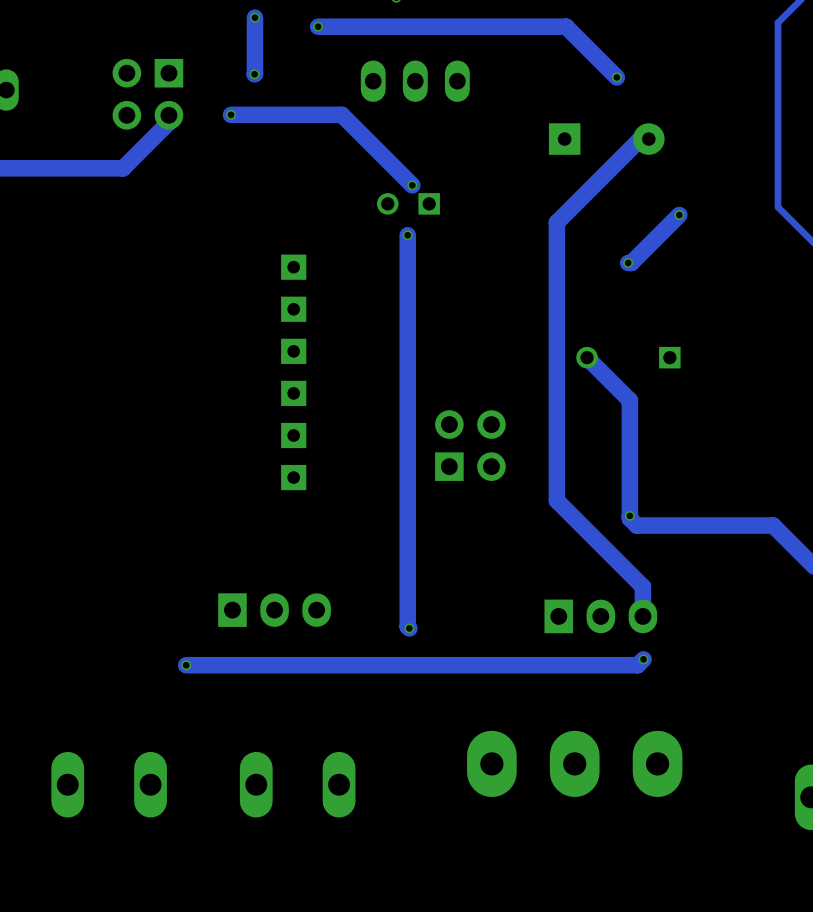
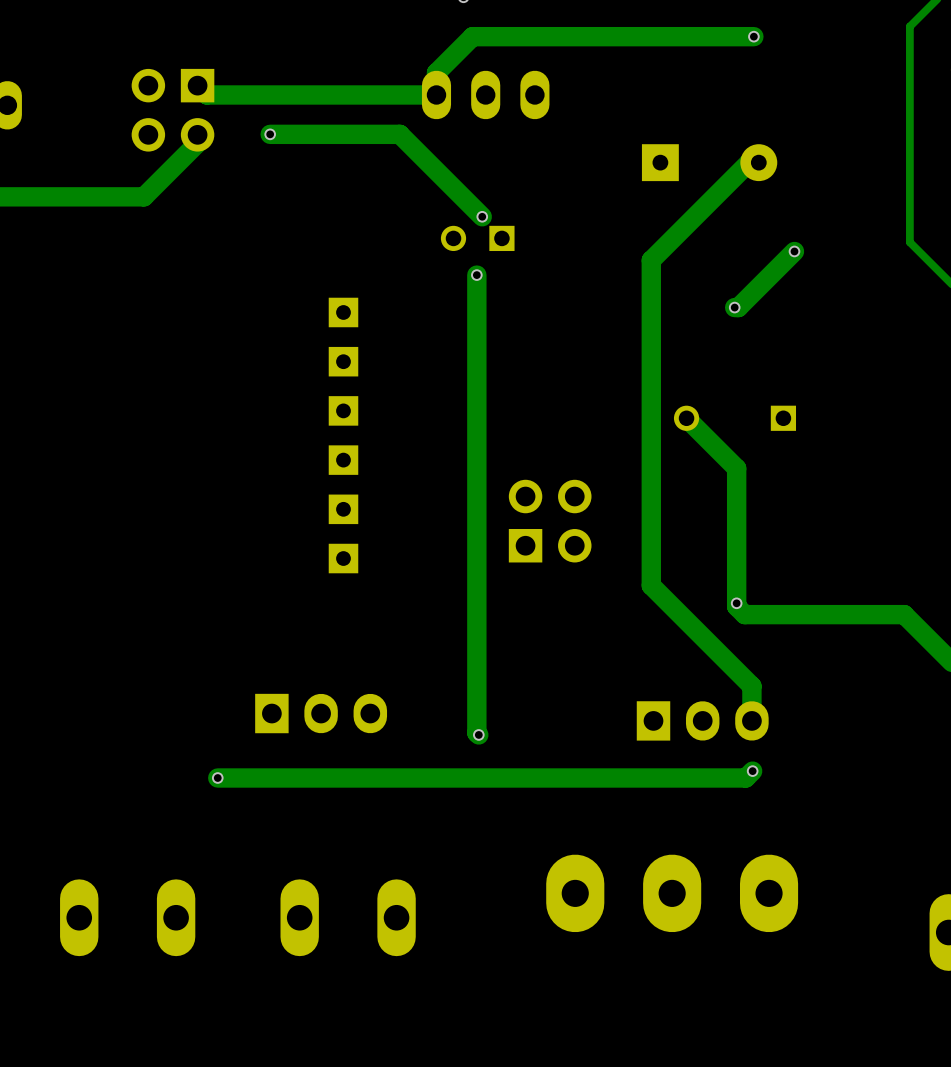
track: (254, 17) (254, 74) -> none
via: (254, 17) -> none
track: (318, 26) (566, 26) (616, 77) -> none
via: (318, 26) -> none
track: none -> (753, 36) (472, 36) (436, 72) (436, 94) (206, 94) (197, 85)
via: (254, 74) -> none
via position: (616, 77) -> (753, 36)

